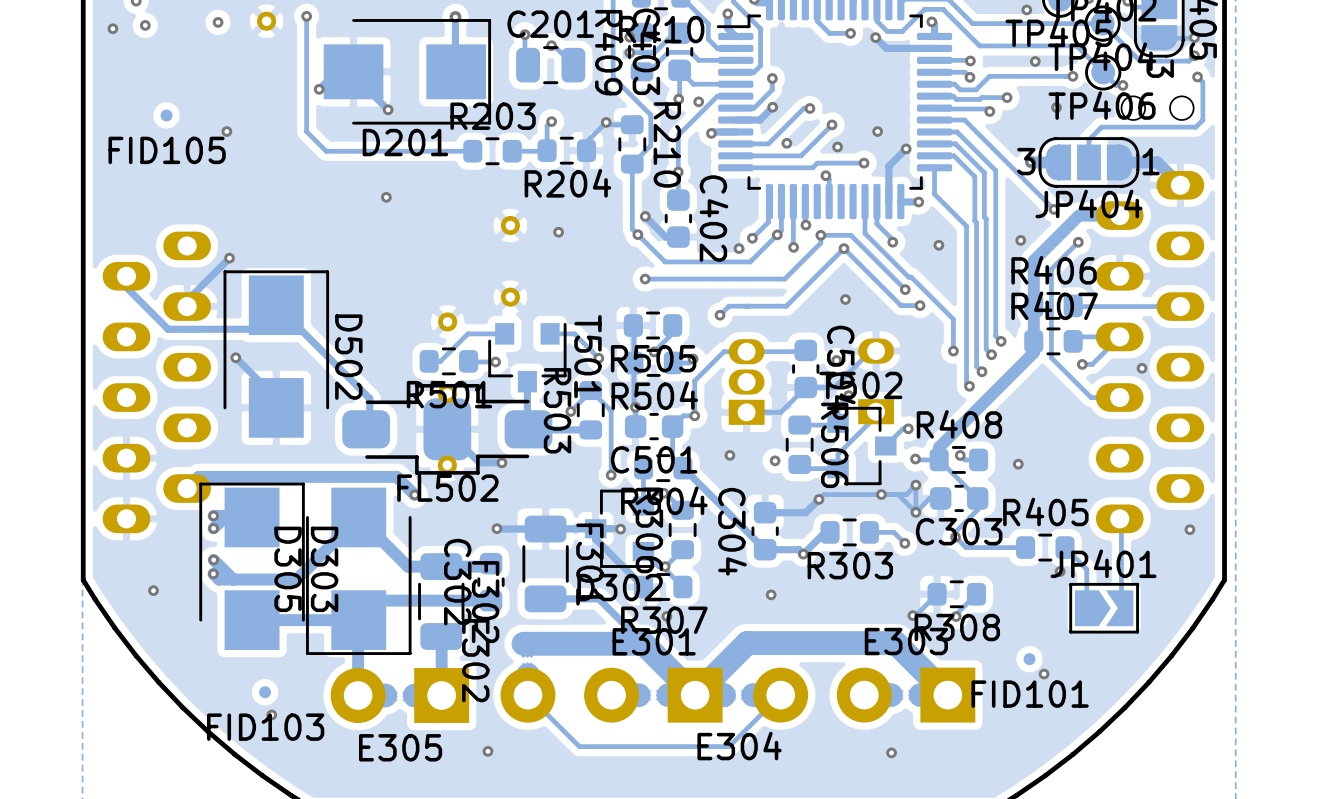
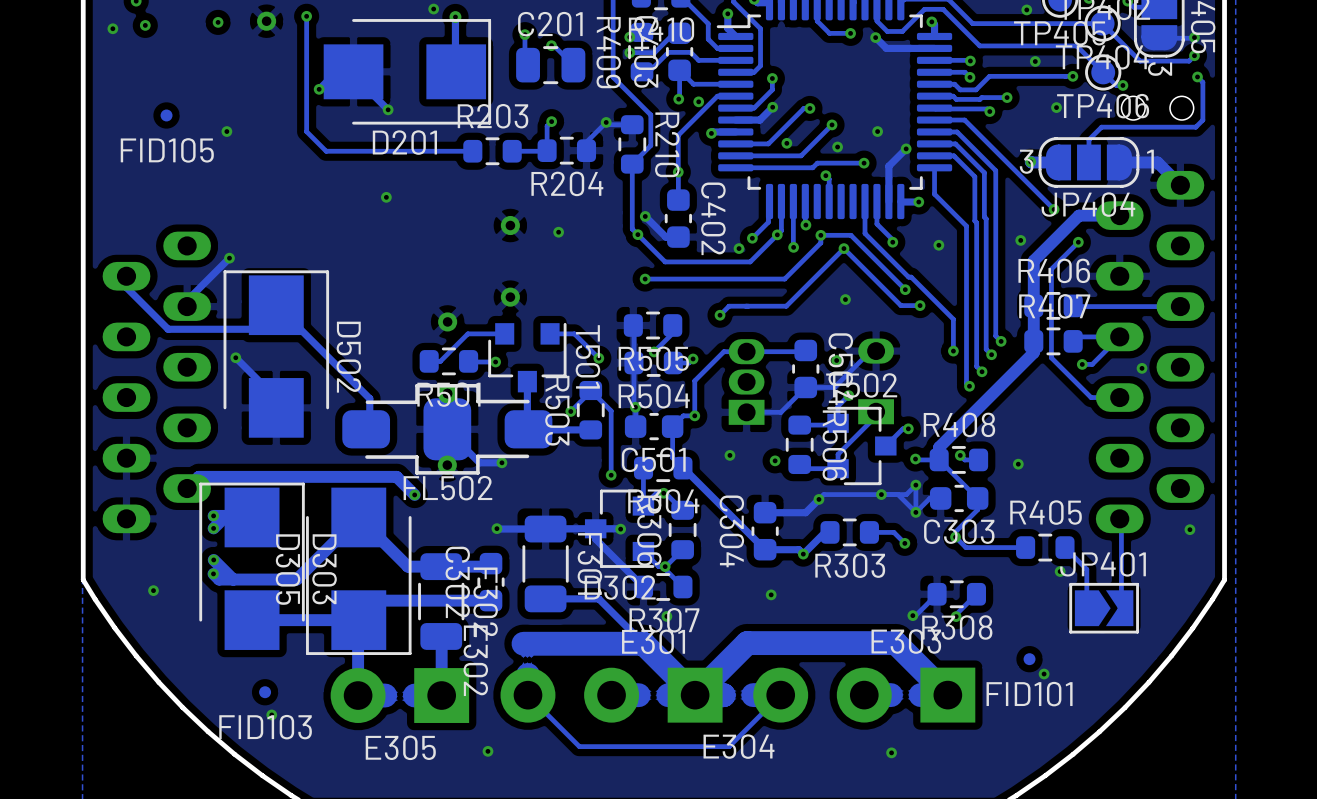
via: none -> (433, 9)

